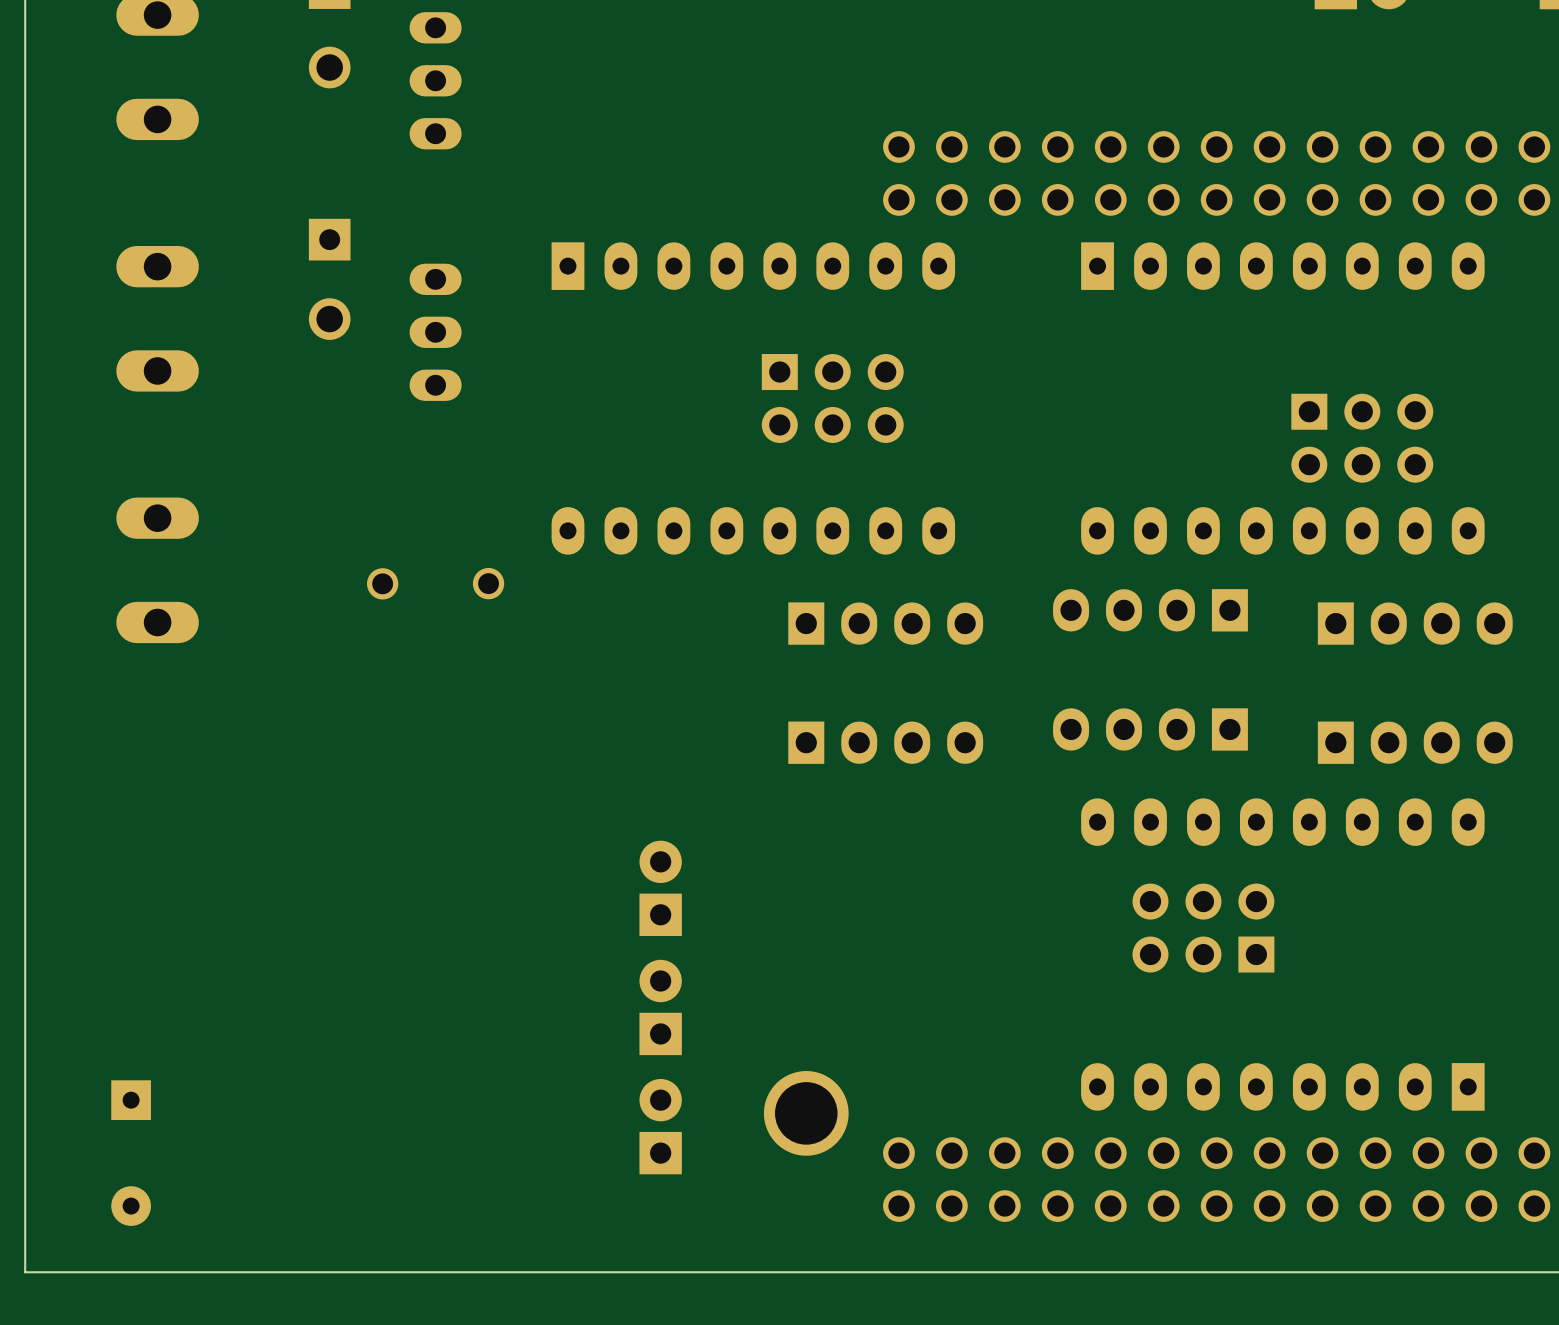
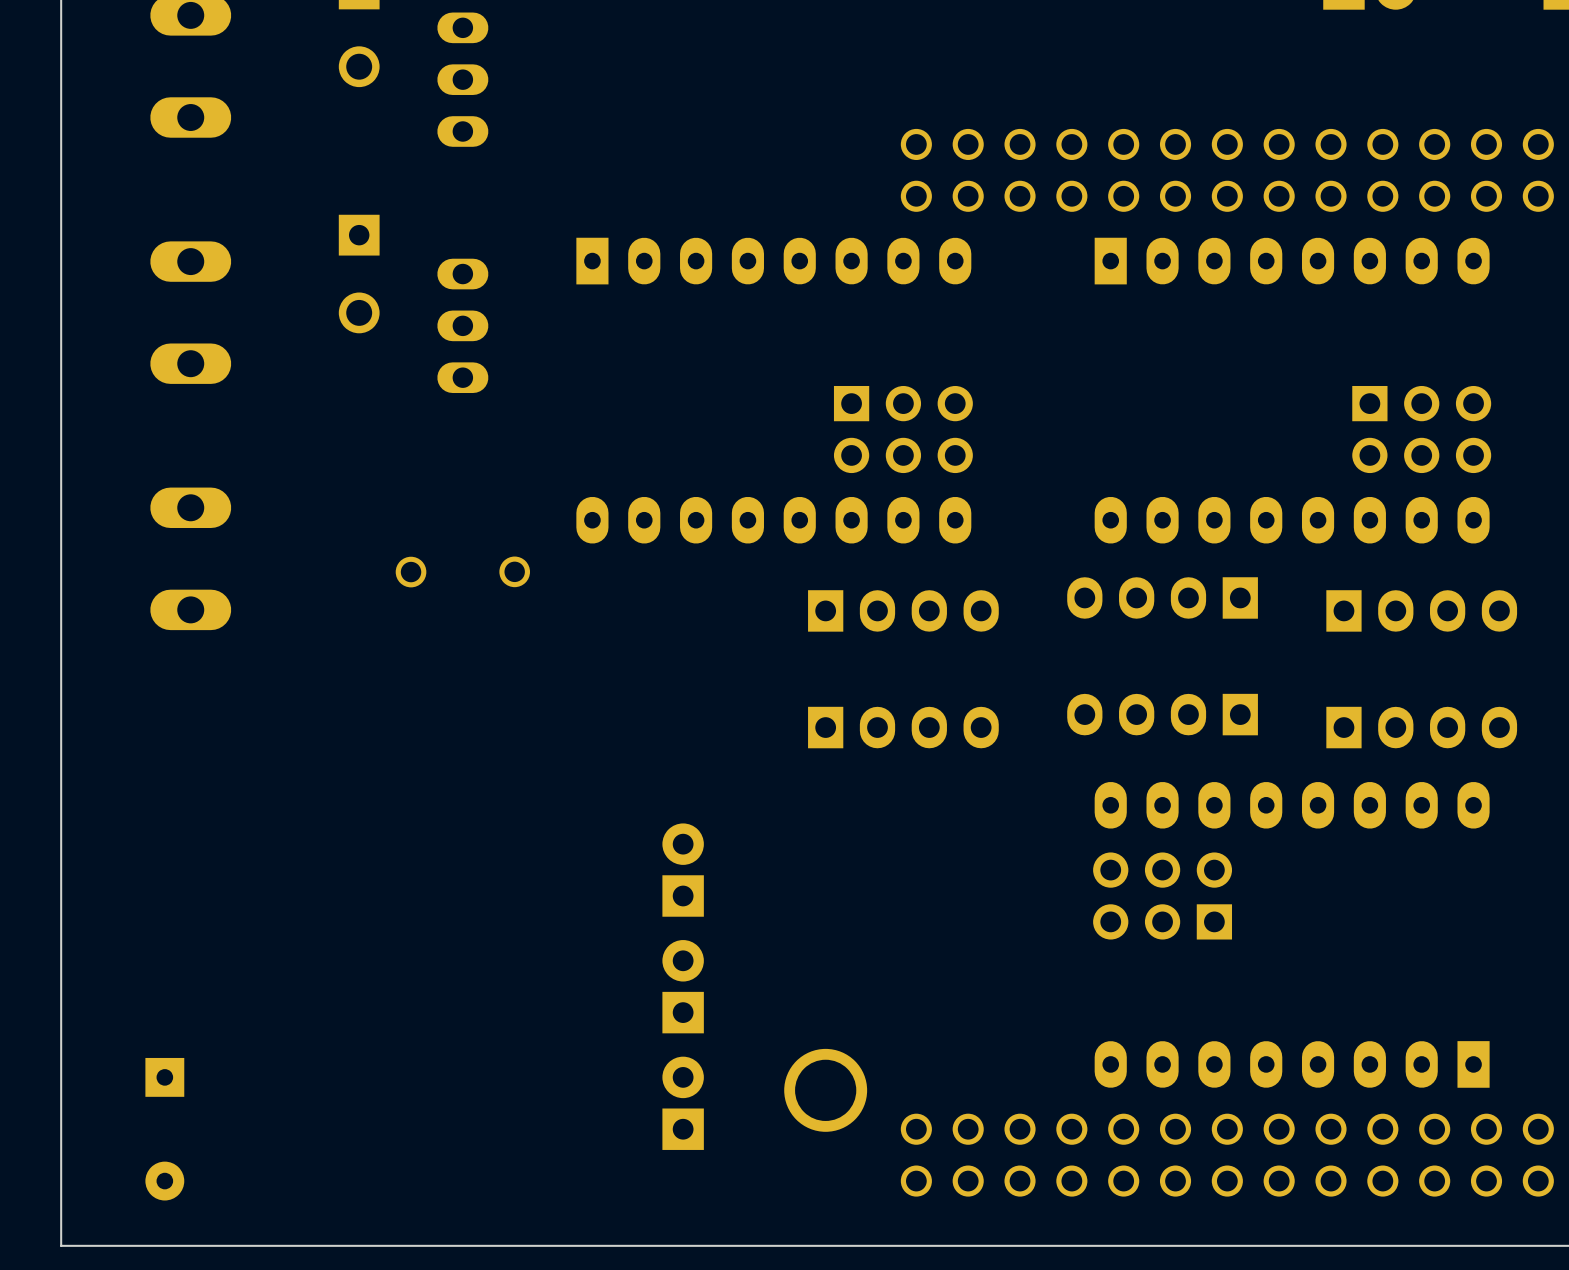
part position: (832, 398) -> (903, 429)
part position: (1362, 438) -> (1421, 429)
part position: (1203, 928) -> (1162, 895)

